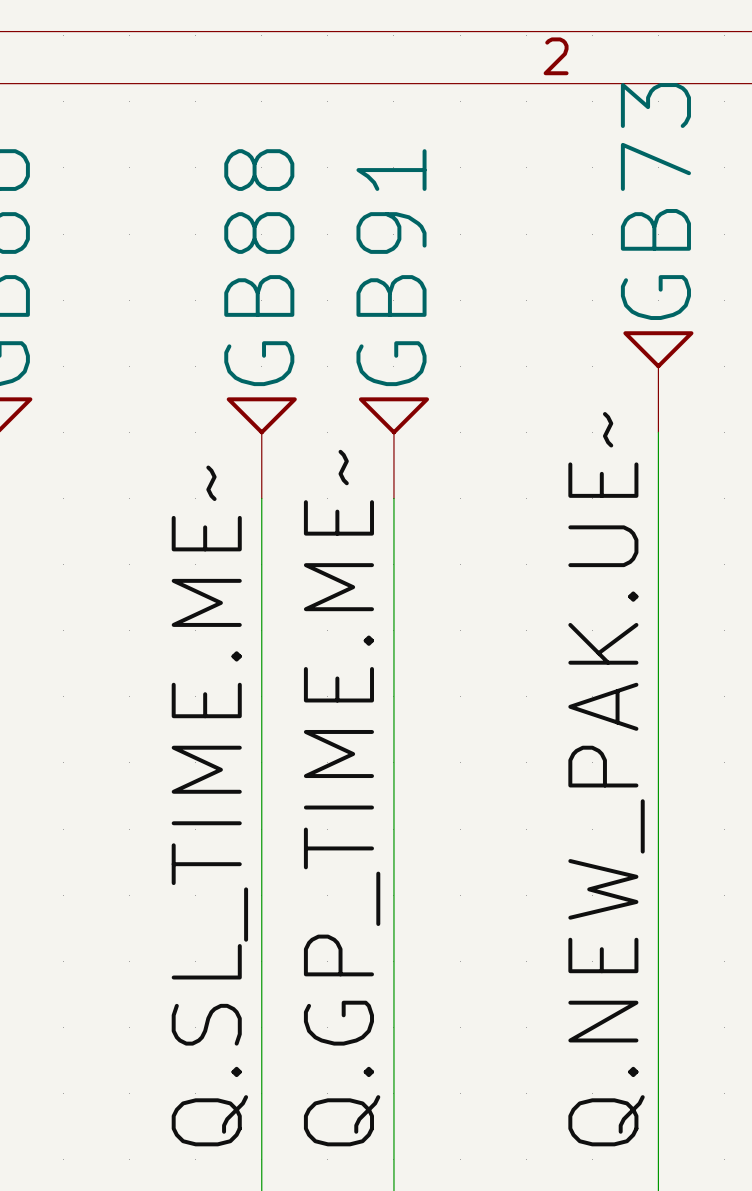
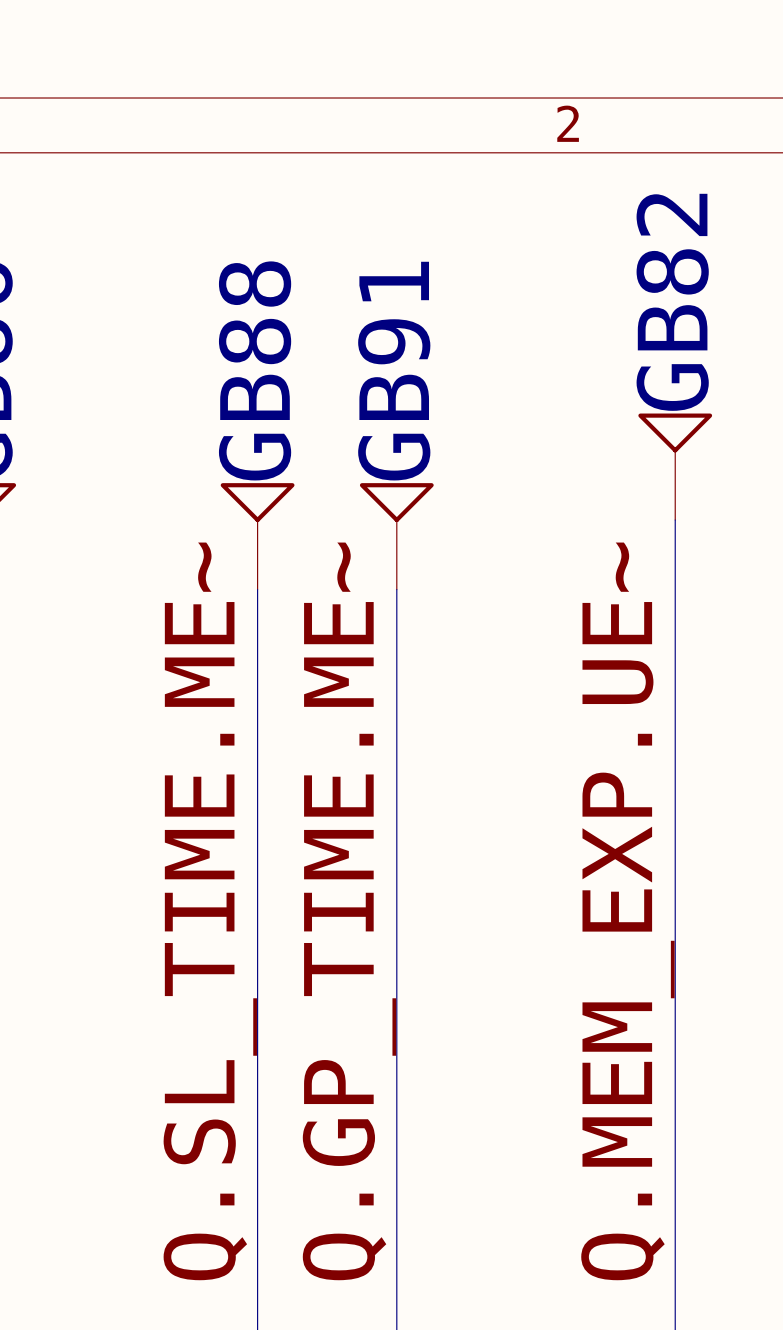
GB73 name: GB73 (655, 201) -> GB82 (672, 302)
label: Q.NEW_PAK.UE~ (606, 779) -> Q.MEM_EXP.UE~ (627, 911)

